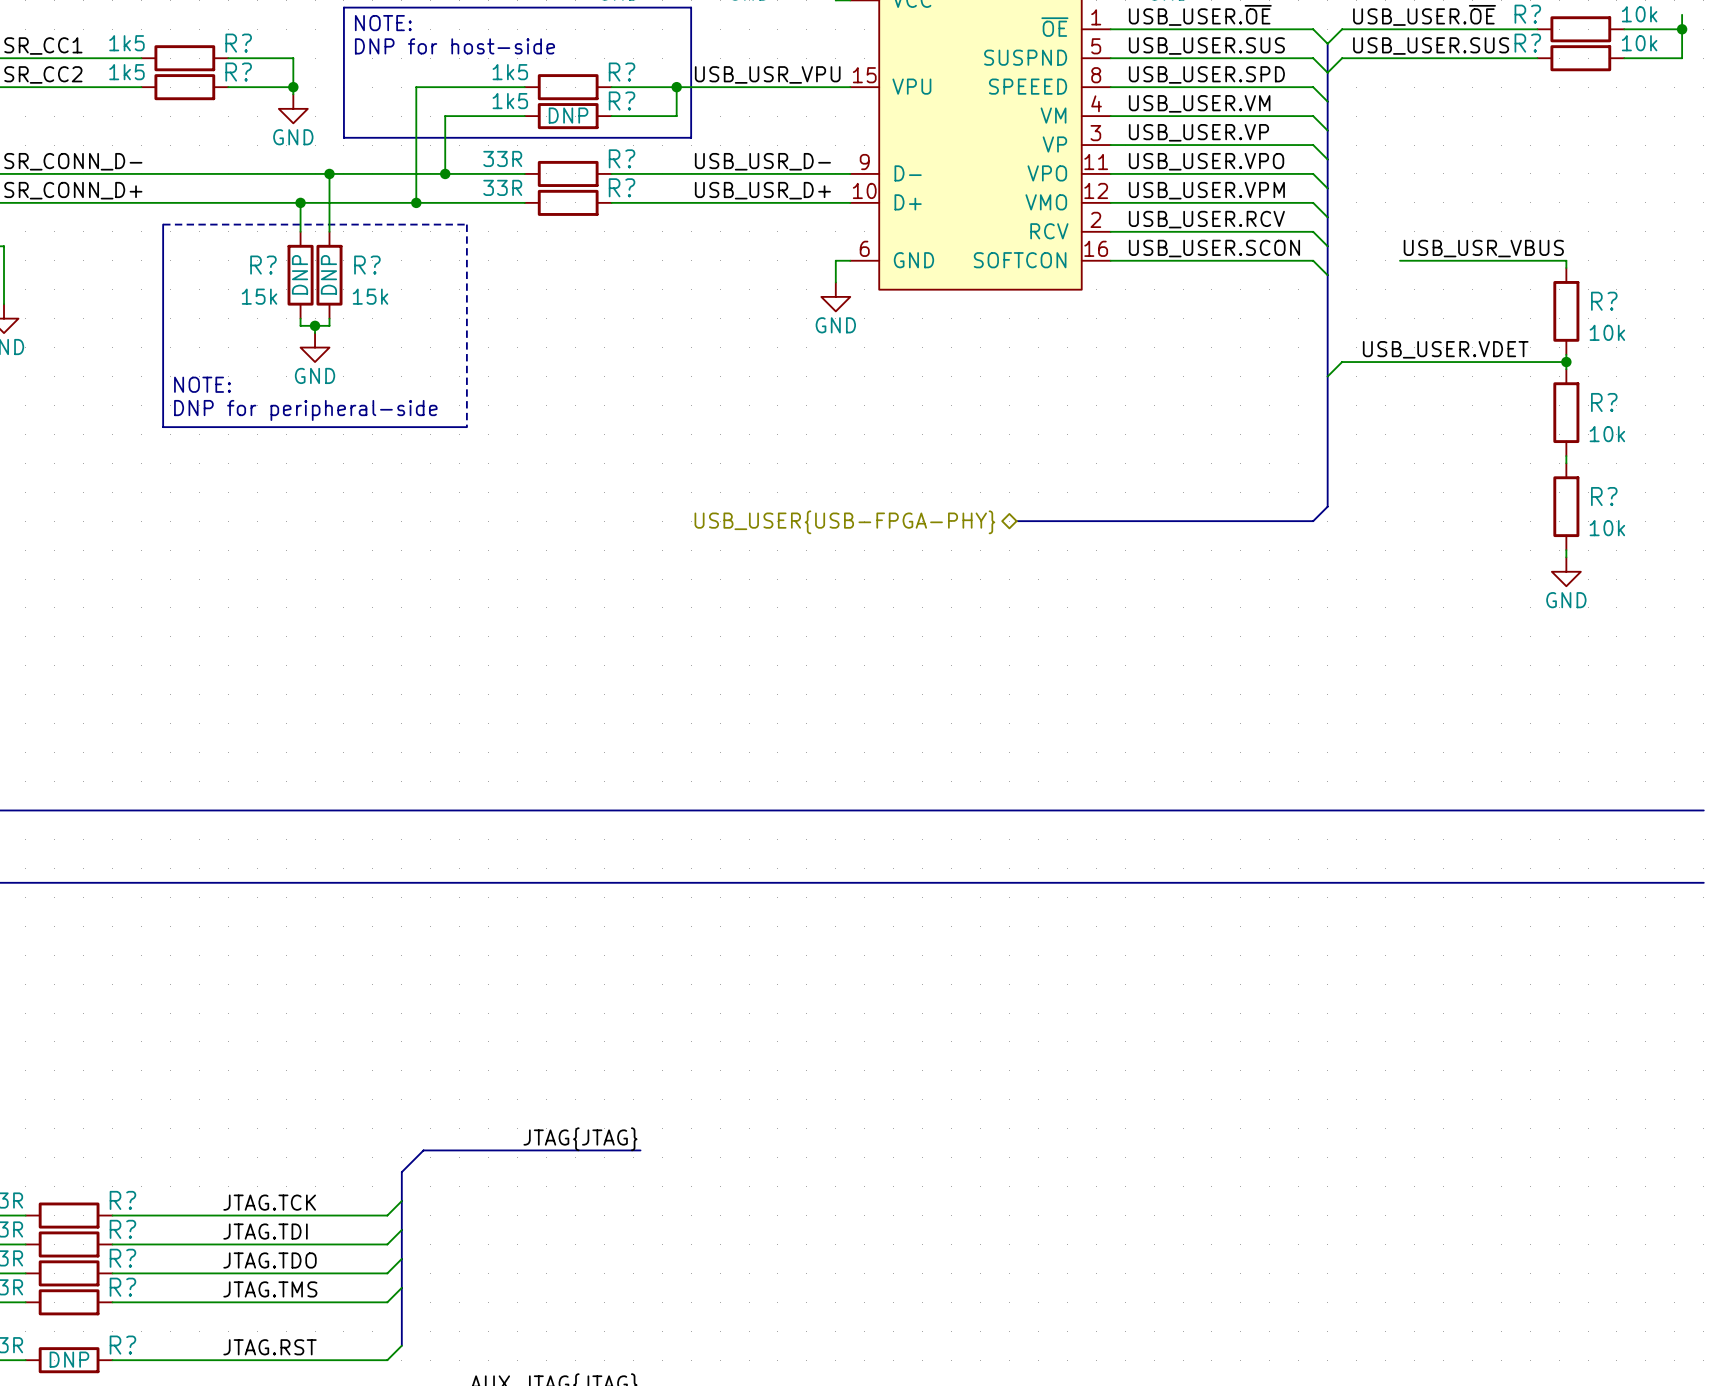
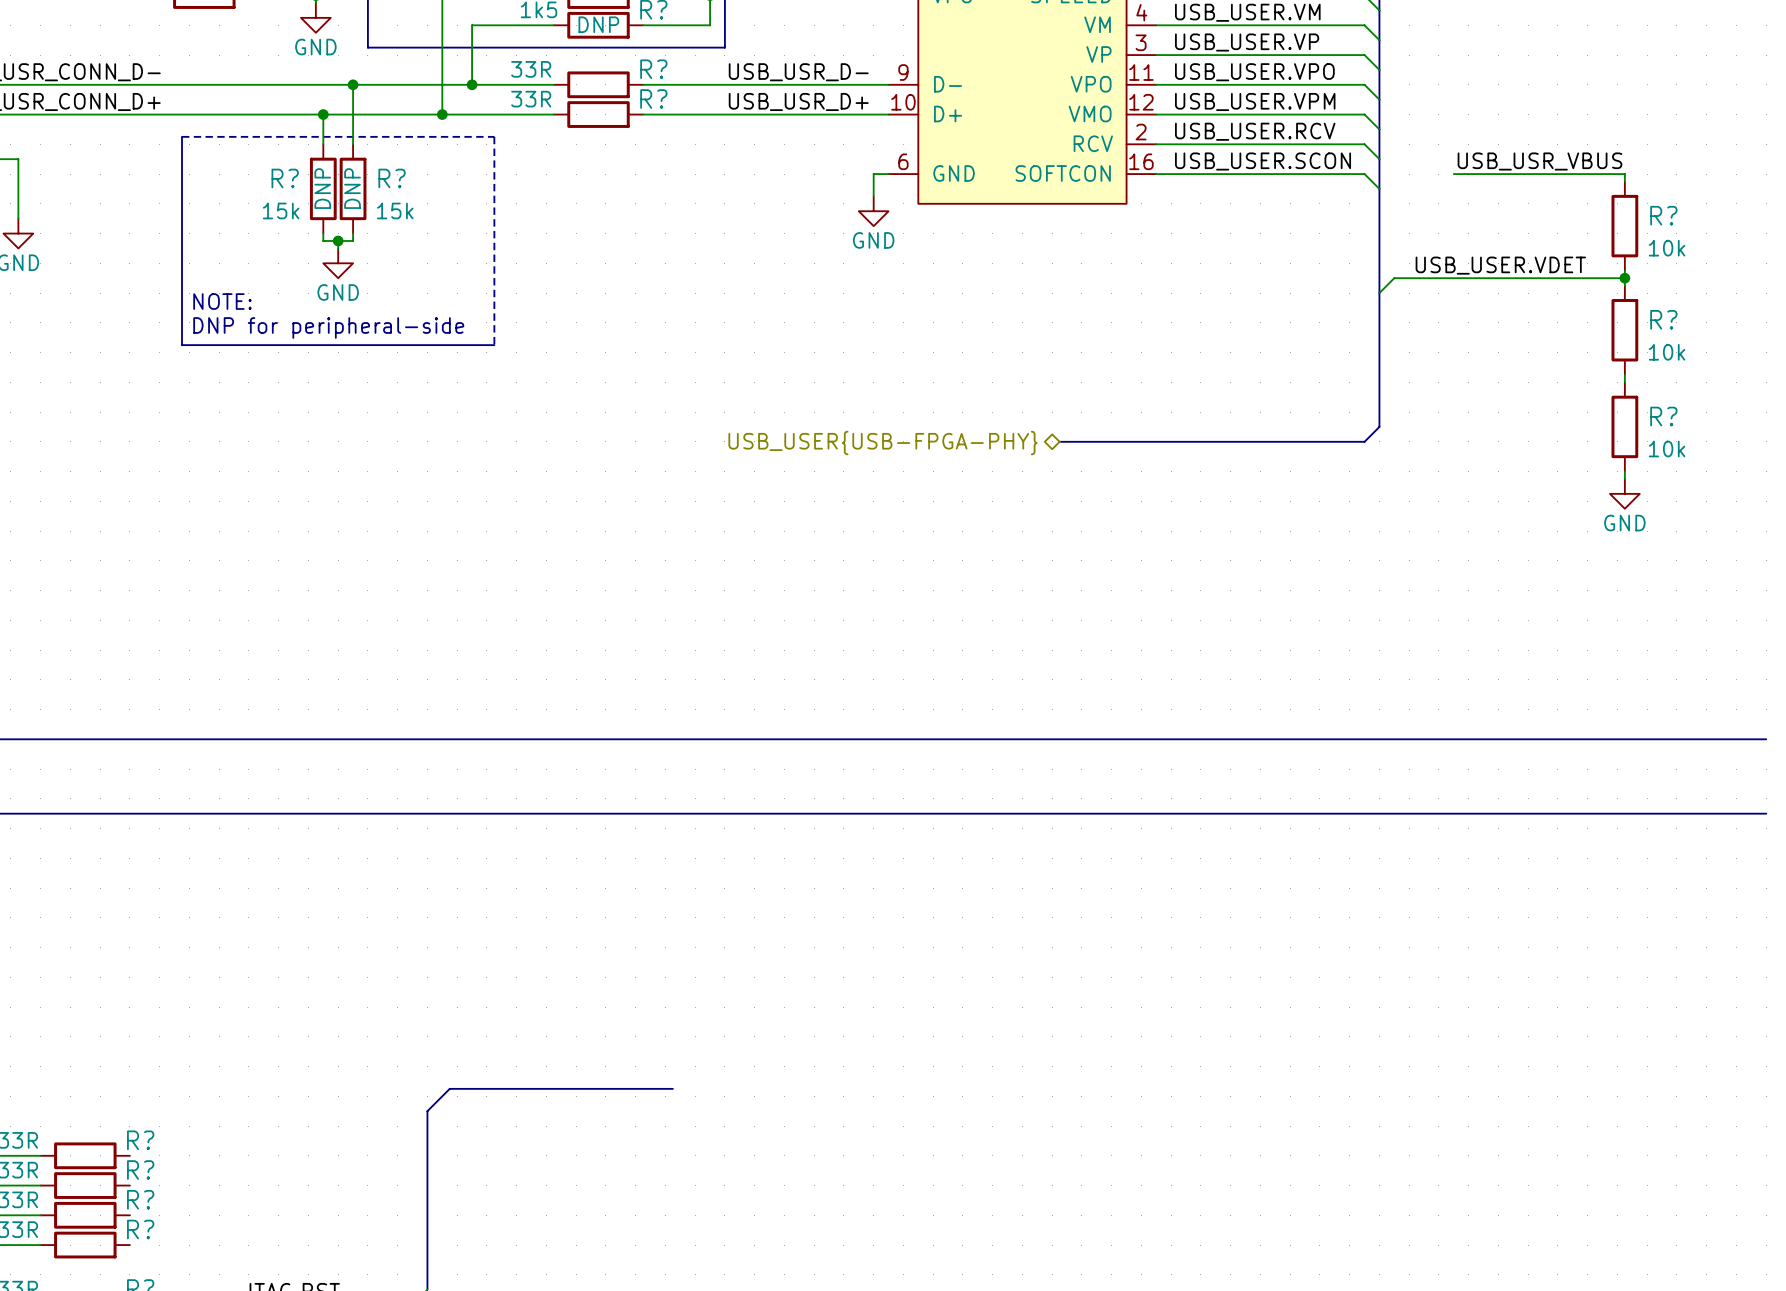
label: JTAG{JTAG} (580, 1139) -> none
wire: (401, 1201) (387, 1215) (112, 1215) -> none
label: JTAG.TCK (269, 1202) -> none
wire: (401, 1230) (387, 1244) (112, 1244) -> none
label: JTAG.TDI (265, 1231) -> none
wire: (401, 1258) (387, 1273) (112, 1273) -> none
label: JTAG.TDO (270, 1260) -> none
wire: (401, 1287) (387, 1302) (112, 1302) -> none
label: JTAG.TMS (270, 1289) -> none

